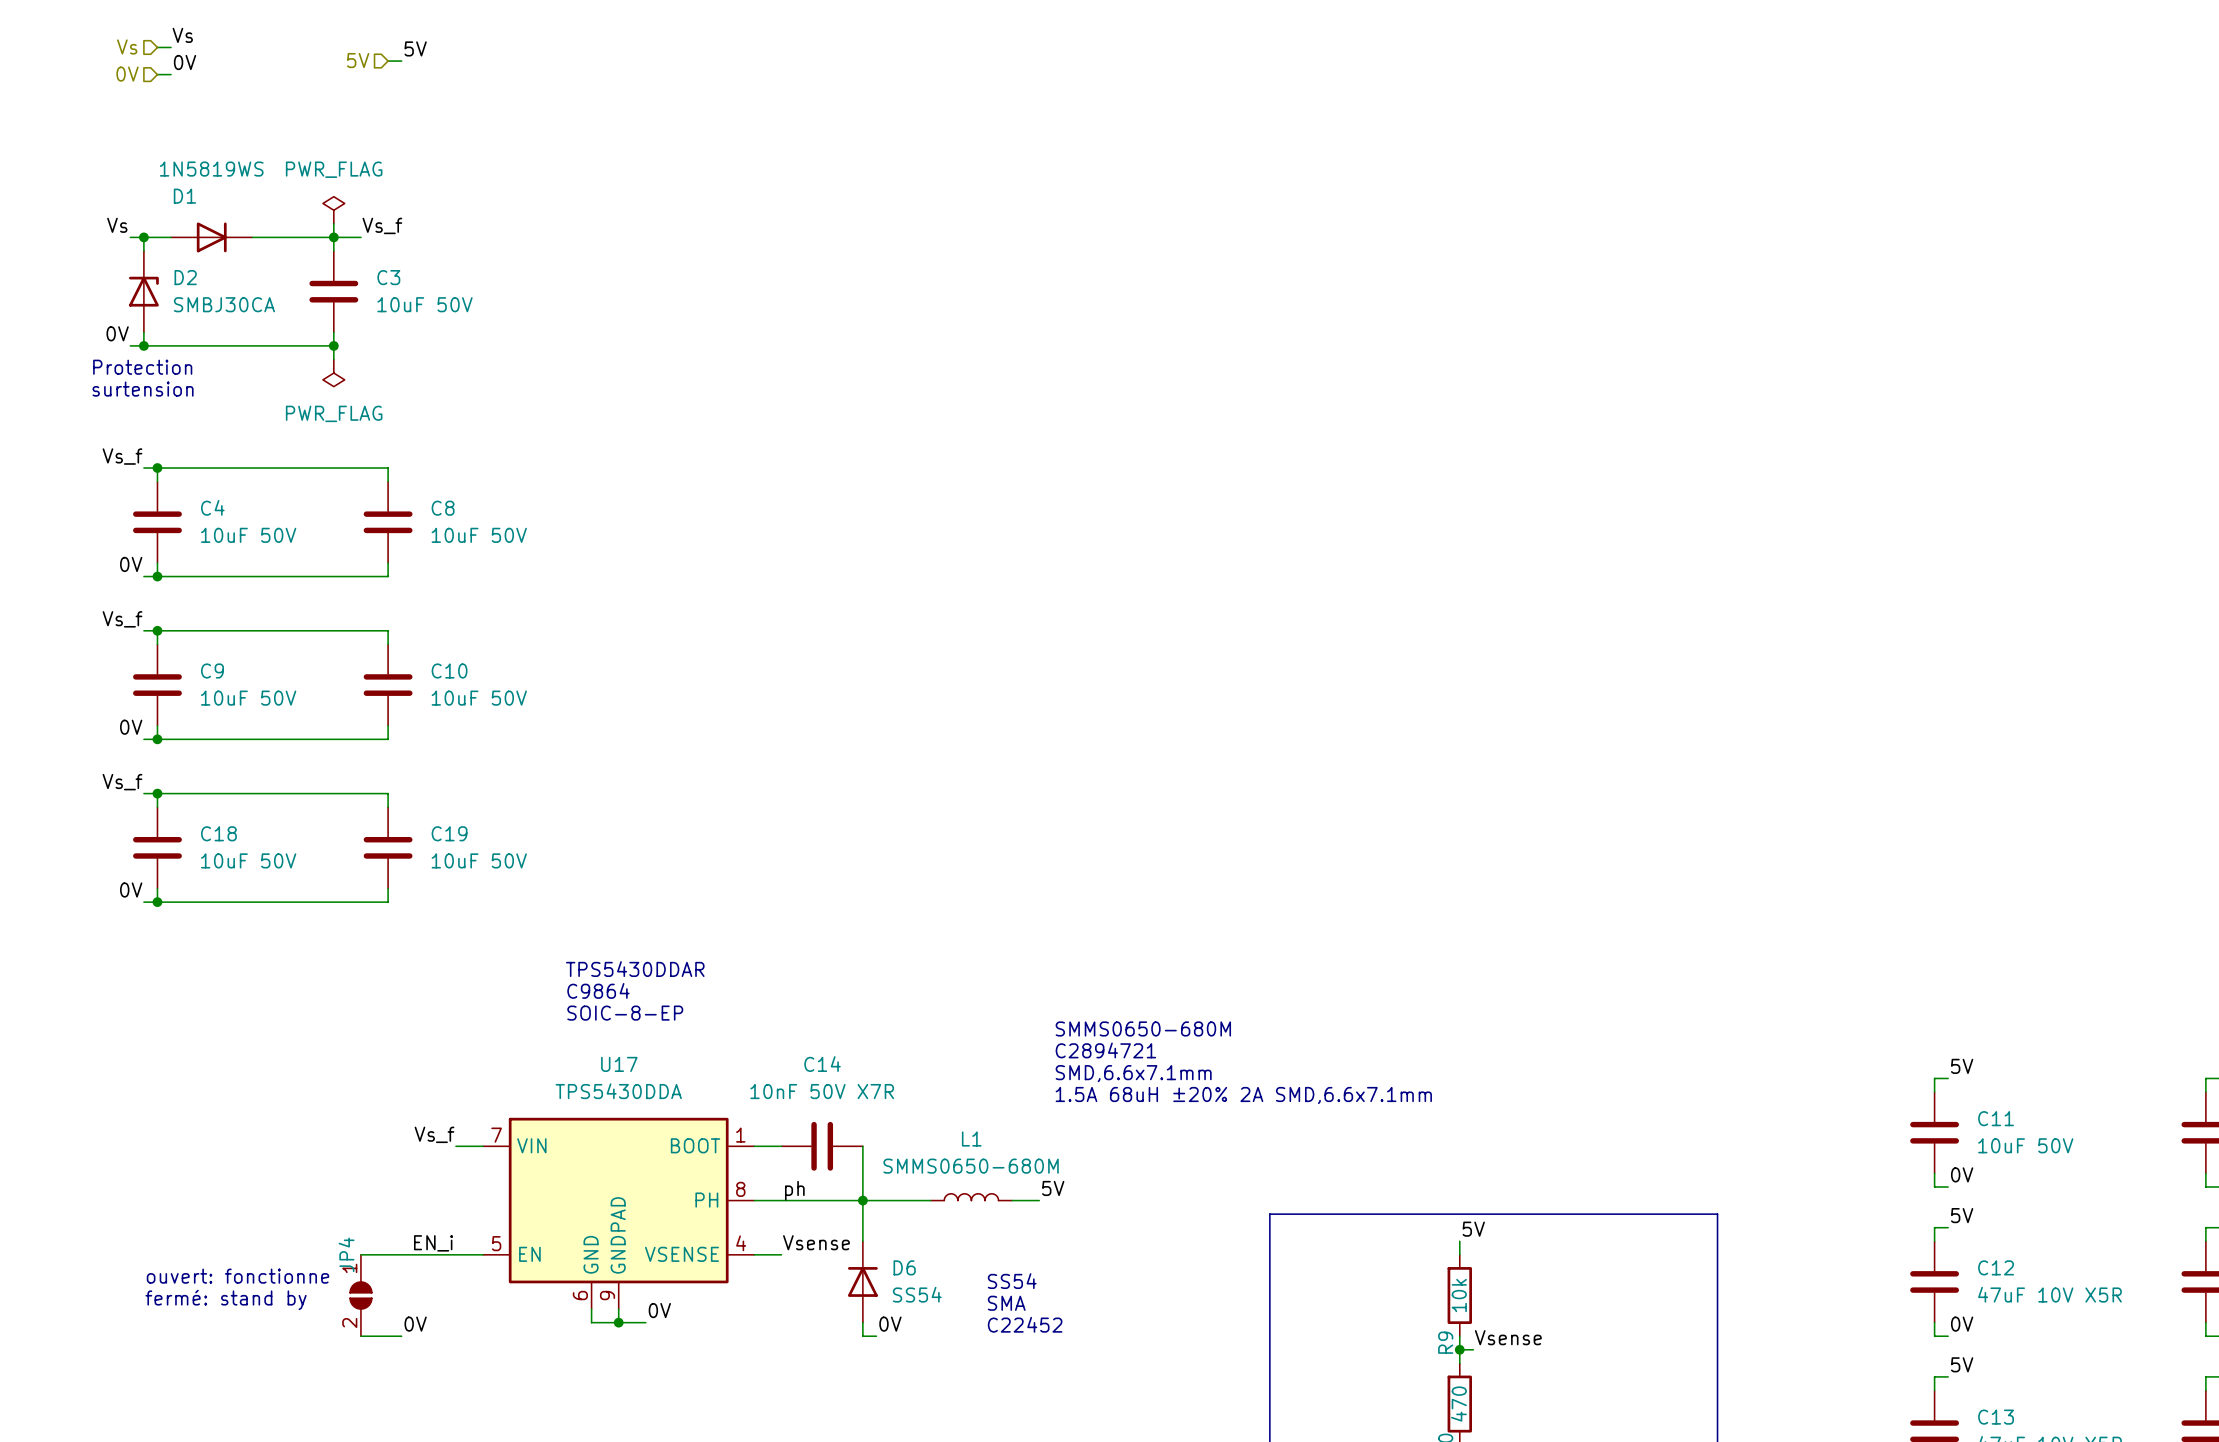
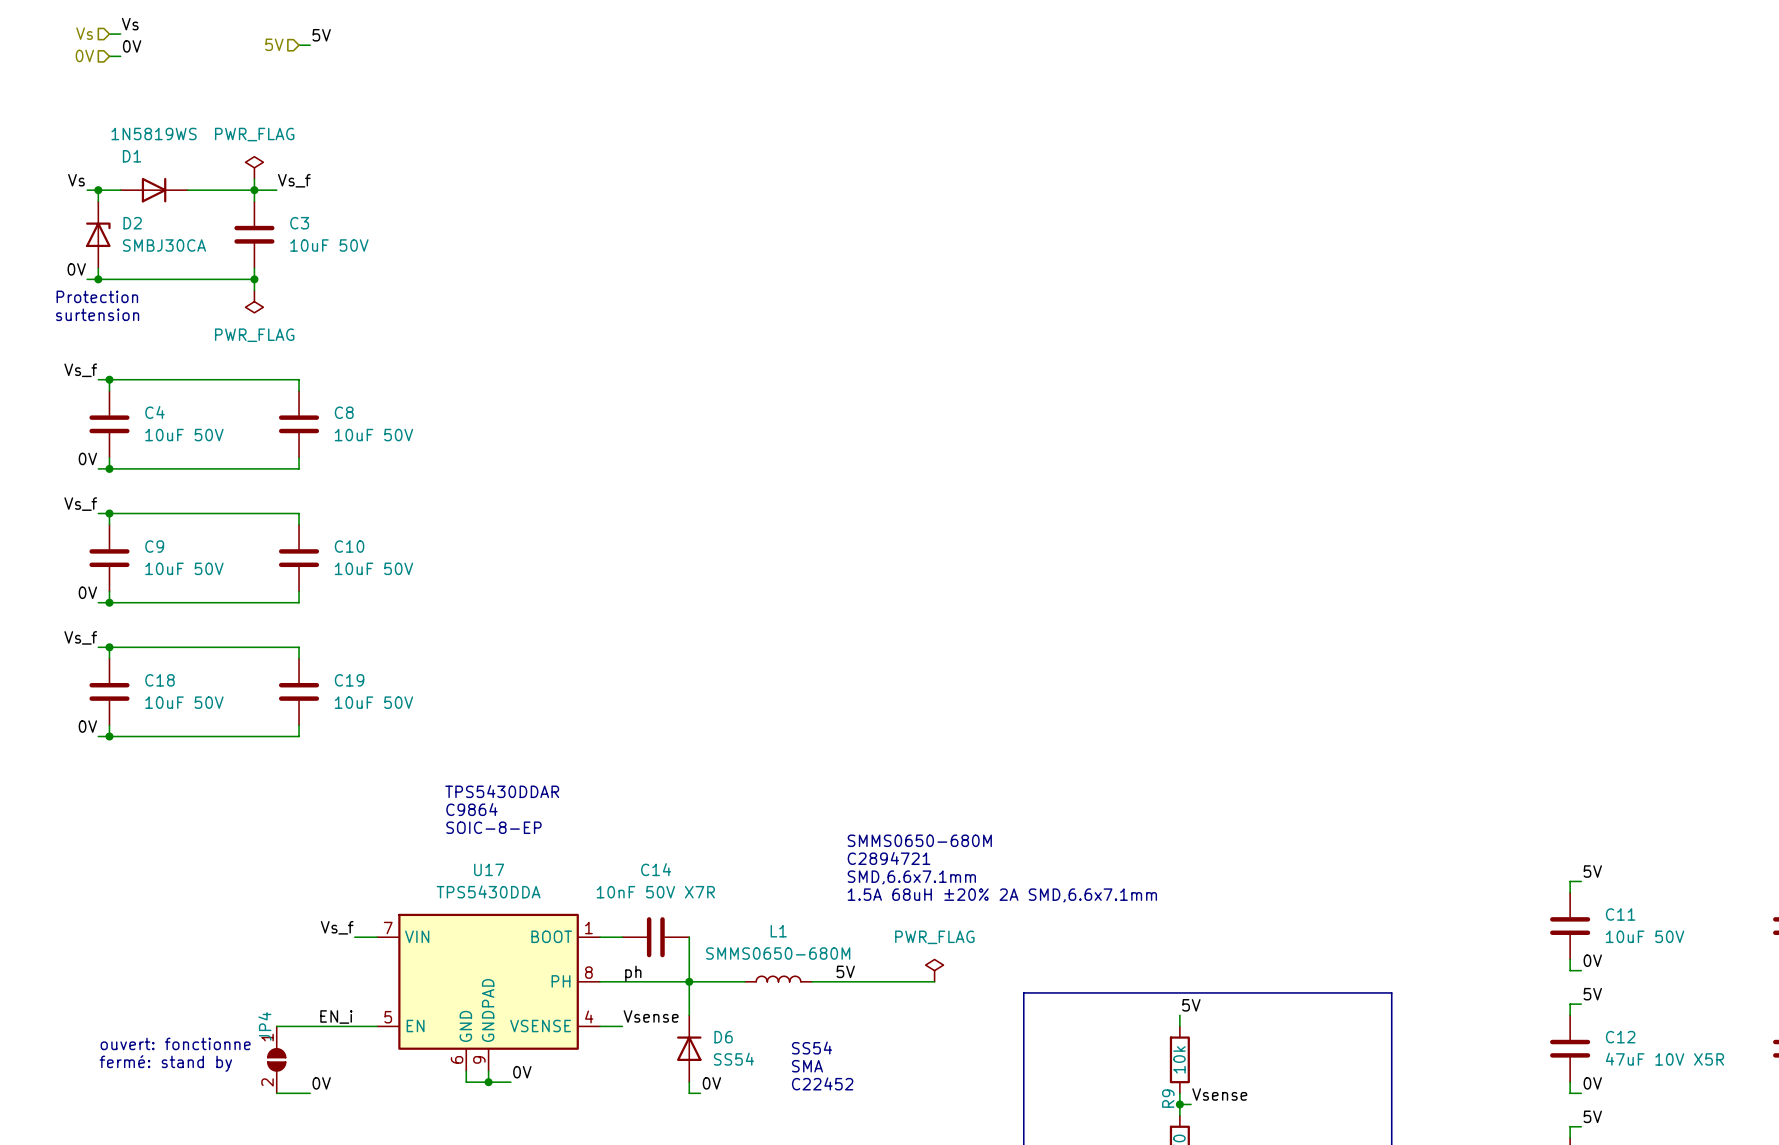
power symbol: none -> PWR_FLAG (934, 970)
wire: none -> (834, 981) (934, 981)

